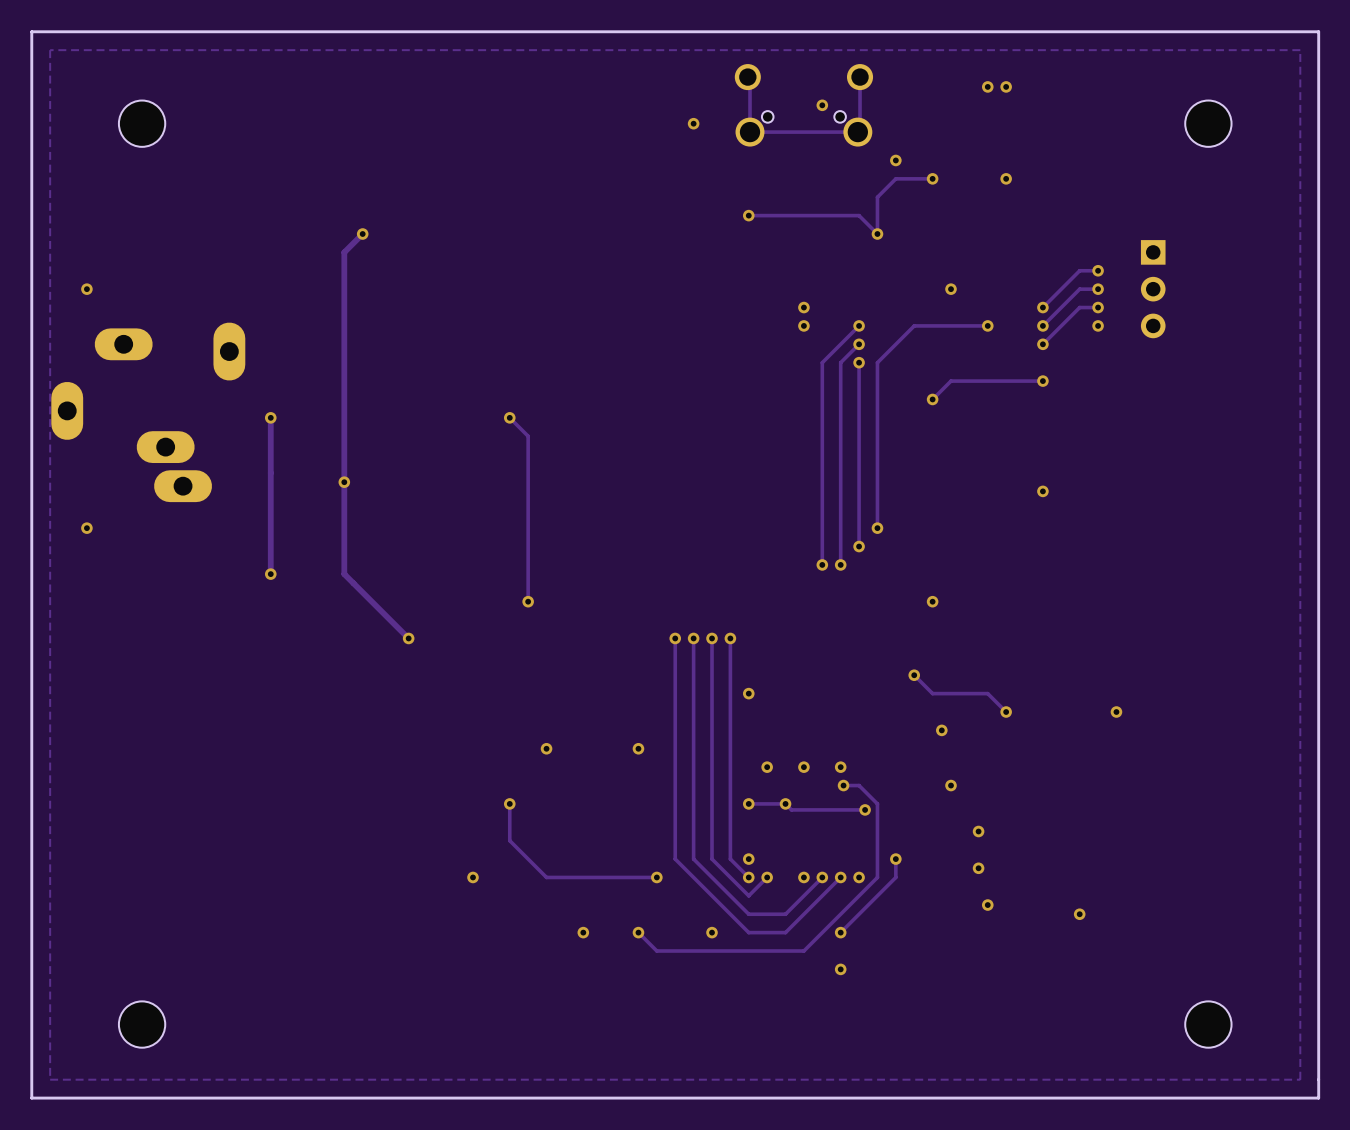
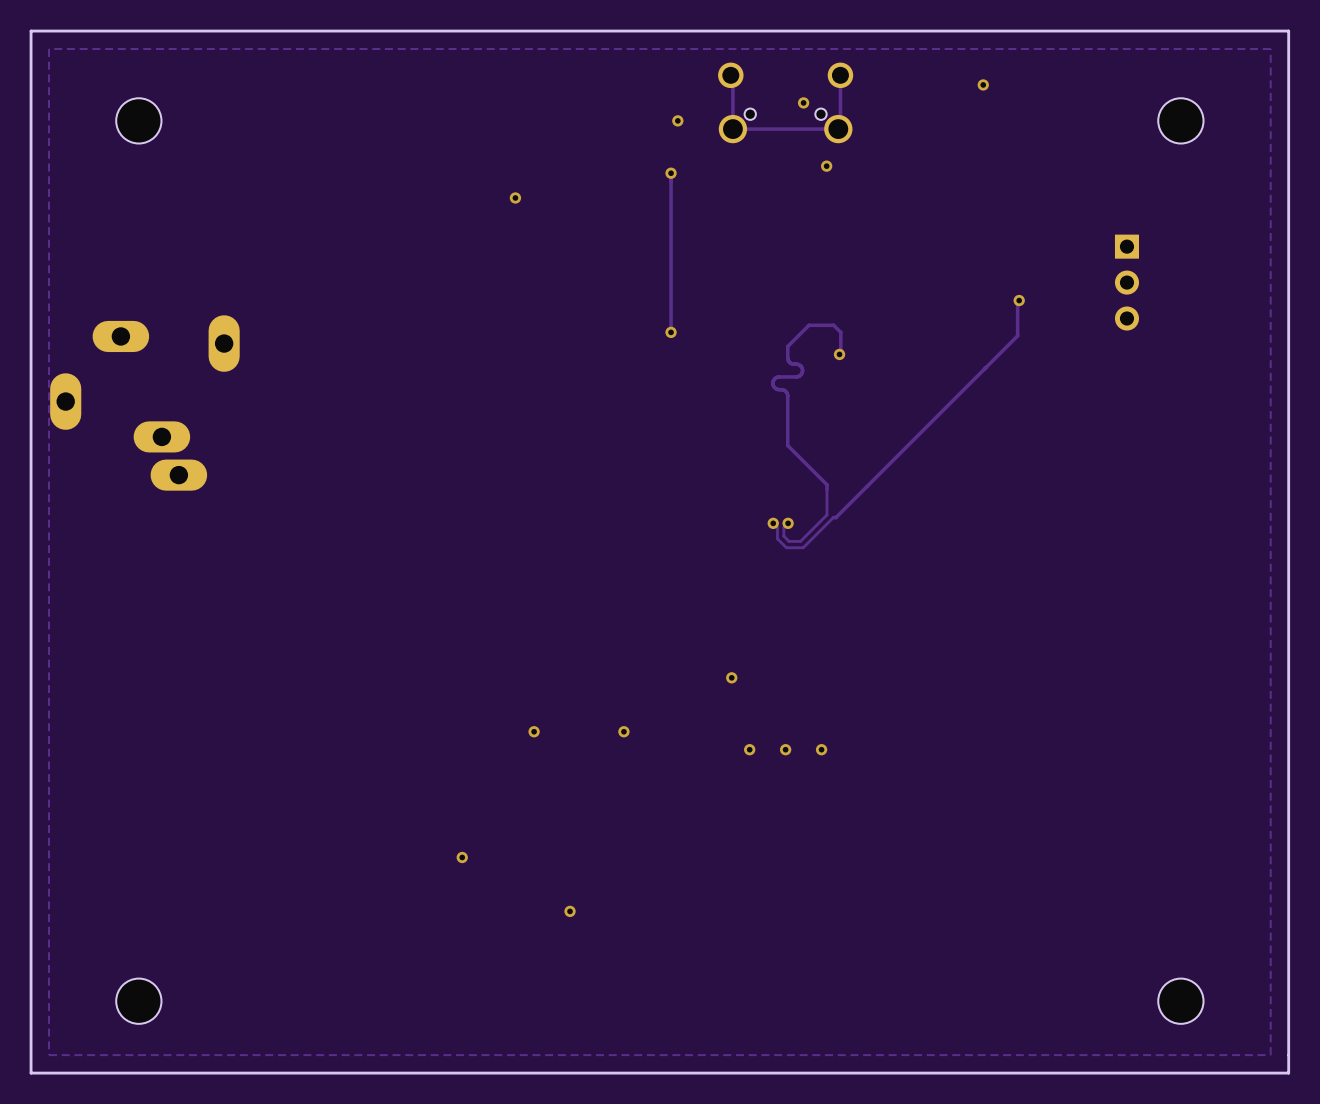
via: (987, 86) -> none
via: (895, 160) -> none
via: none -> (826, 166)
track: none -> (671, 173) (671, 332)
via: none -> (671, 173)
track: (932, 178) (895, 178) (877, 197) (877, 234) (859, 215) (748, 215) -> none
via: (932, 178) -> none
via: (1006, 178) -> none
via: none -> (515, 197)
via: (748, 215) -> none
track: (362, 234) (344, 252) (344, 574) (408, 638) -> none
via: (362, 234) -> none
via: (877, 234) -> none
track: (1098, 270) (1079, 270) (1042, 307) -> none
via: (1098, 270) -> none
via: (86, 289) -> none
via: (951, 289) -> none
track: (1098, 289) (1079, 289) (1042, 325) -> none
via: (1098, 289) -> none
track: none -> (1017, 297) (1017, 335) (835, 517) (833, 517) (803, 547) (786, 547) (777, 538) (777, 527) (773, 523)
via: (803, 307) -> none
track: (1098, 307) (1079, 307) (1042, 344) -> none
via: (1098, 307) -> none
via: (803, 325) -> none
track: (859, 325) (822, 362) (822, 564) -> none
via: (859, 325) -> none
track: (987, 325) (914, 325) (877, 362) (877, 528) -> none
via: (987, 325) -> none
via: (1042, 325) -> none
via: (1098, 325) -> none
via: none -> (671, 332)
track: (859, 344) (840, 362) (840, 564) -> none
via: (859, 344) -> none
via: (1042, 344) -> none
track: none -> (840, 350) (840, 332) (833, 325) (808, 325) (787, 346) (788, 360) (801, 366) (801, 374) (796, 376) (777, 377) (773, 381) (775, 388) (784, 390) (787, 394) (787, 445) (827, 484) (827, 514) (800, 541) (789, 541) (783, 536) (783, 527) (788, 523)
track: (859, 362) (859, 546) -> none
track: (1042, 381) (951, 381) (932, 399) -> none
via: (1042, 381) -> none
via: (932, 399) -> none
track: (270, 417) (270, 574) -> none
via: (270, 417) -> none
track: (509, 417) (528, 436) (528, 601) -> none
via: (509, 417) -> none
via: (344, 482) -> none
via: (1042, 491) -> none
via: (86, 528) -> none
via: (877, 528) -> none
via: none -> (773, 523)
via: none -> (788, 523)
via: (859, 546) -> none
via: (822, 564) -> none
via: (840, 564) -> none
via: (270, 574) -> none
via: (528, 601) -> none
via: (932, 601) -> none
via: (408, 638) -> none
track: (675, 638) (675, 859) (748, 932) (785, 932) (840, 877) -> none
via: (675, 638) -> none
track: (693, 638) (693, 859) (748, 914) (785, 914) (822, 877) -> none
via: (693, 638) -> none
track: (712, 638) (712, 859) (748, 895) (767, 877) -> none
via: (712, 638) -> none
track: (730, 638) (730, 859) (748, 877) -> none
via: (730, 638) -> none
track: (914, 675) (932, 693) (987, 693) (1006, 712) -> none
via: (914, 675) -> none
via: (1006, 712) -> none
via: (1116, 712) -> none
via: (941, 730) -> none
track: (843, 785) (859, 785) (877, 803) (877, 877) (803, 951) (656, 951) (638, 932) -> none
via: (843, 785) -> none
via: (951, 785) -> none
track: (509, 803) (509, 840) (546, 877) (656, 877) -> none
via: (509, 803) -> none
track: (748, 803) (785, 803) (791, 809) (865, 809) -> none
via: (748, 803) -> none
via: (785, 803) -> none
via: (865, 809) -> none
via: (978, 831) -> none
via: (748, 859) -> none
track: (895, 859) (895, 877) (840, 932) -> none
via: (895, 859) -> none
via: (978, 868) -> none
via: (656, 877) -> none
via: (748, 877) -> none
via: (767, 877) -> none
via: (803, 877) -> none
via: (822, 877) -> none
via: (840, 877) -> none
via: (859, 877) -> none
via: (987, 905) -> none
via: (1079, 914) -> none
via: (638, 932) -> none
via: (712, 932) -> none
via: (840, 932) -> none
via: (840, 969) -> none

